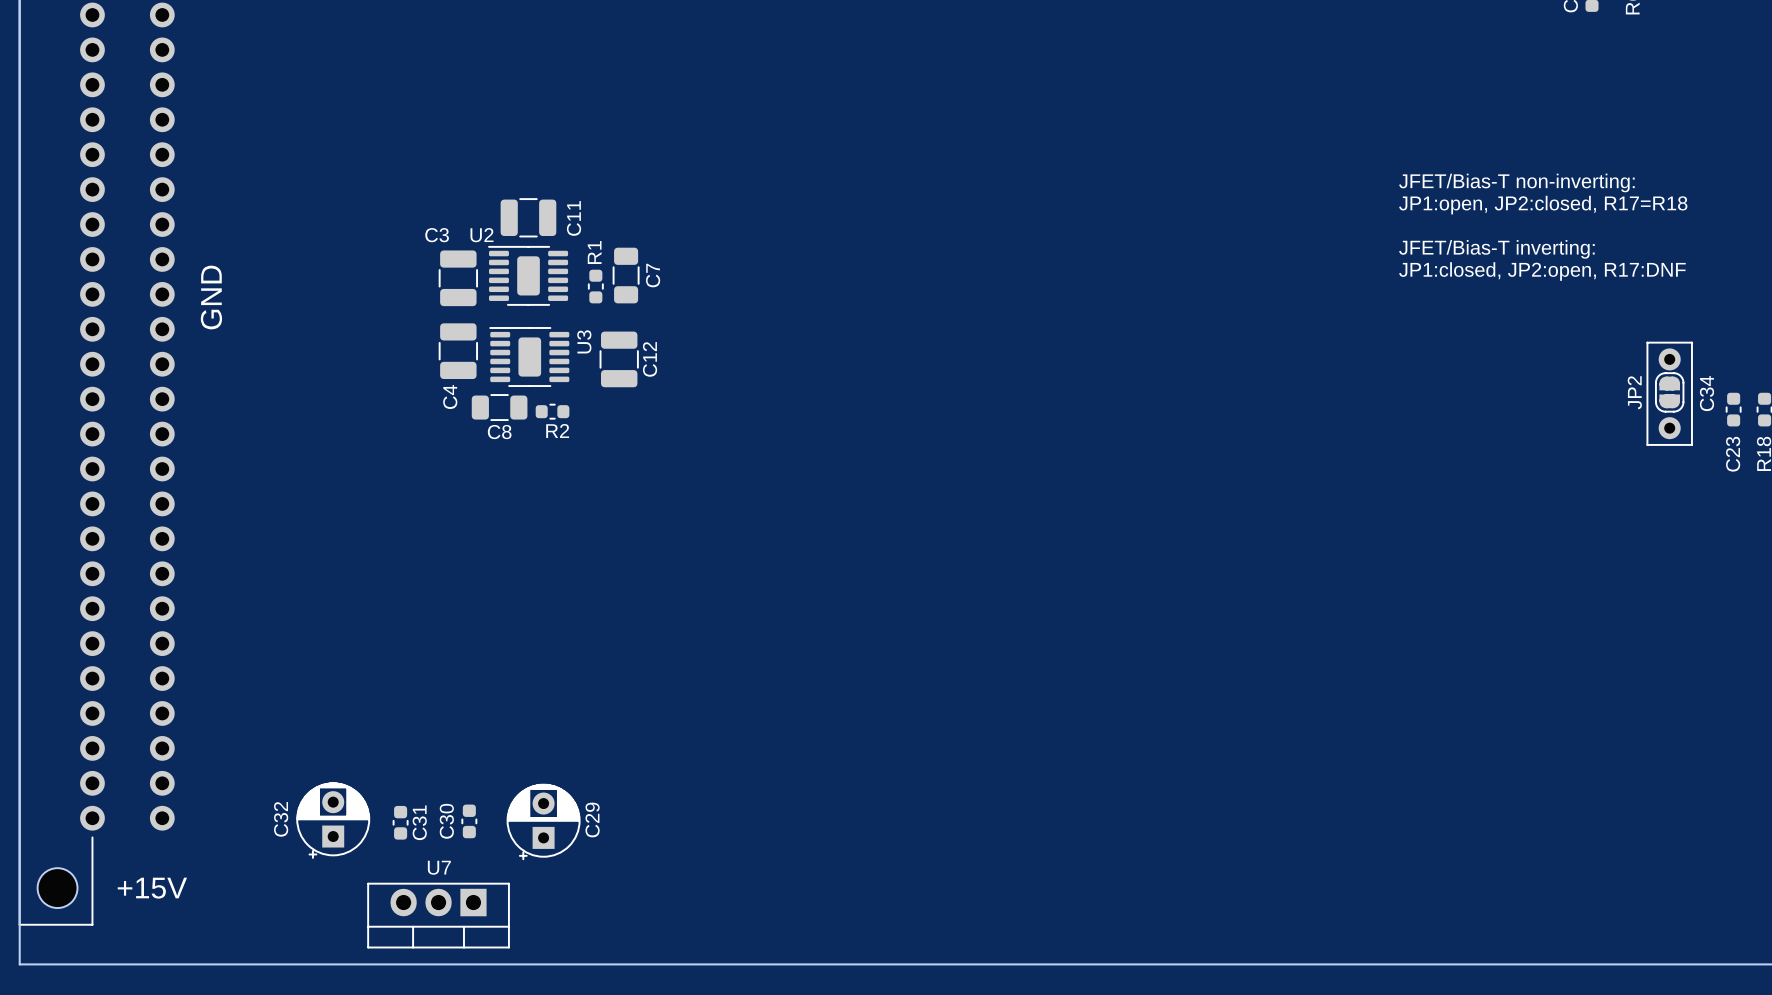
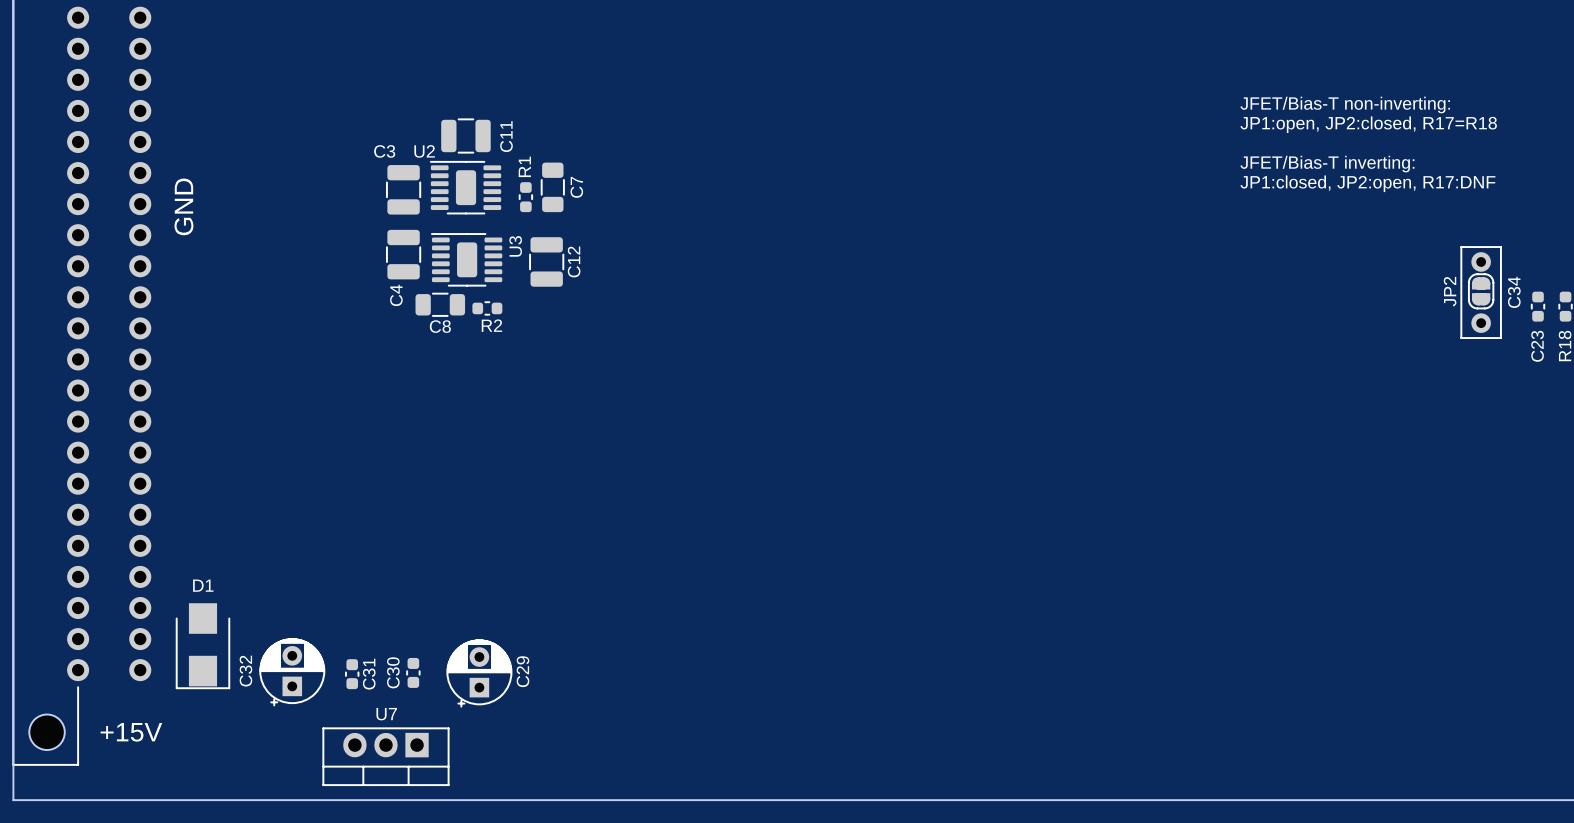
D1: none -> (202, 646)

